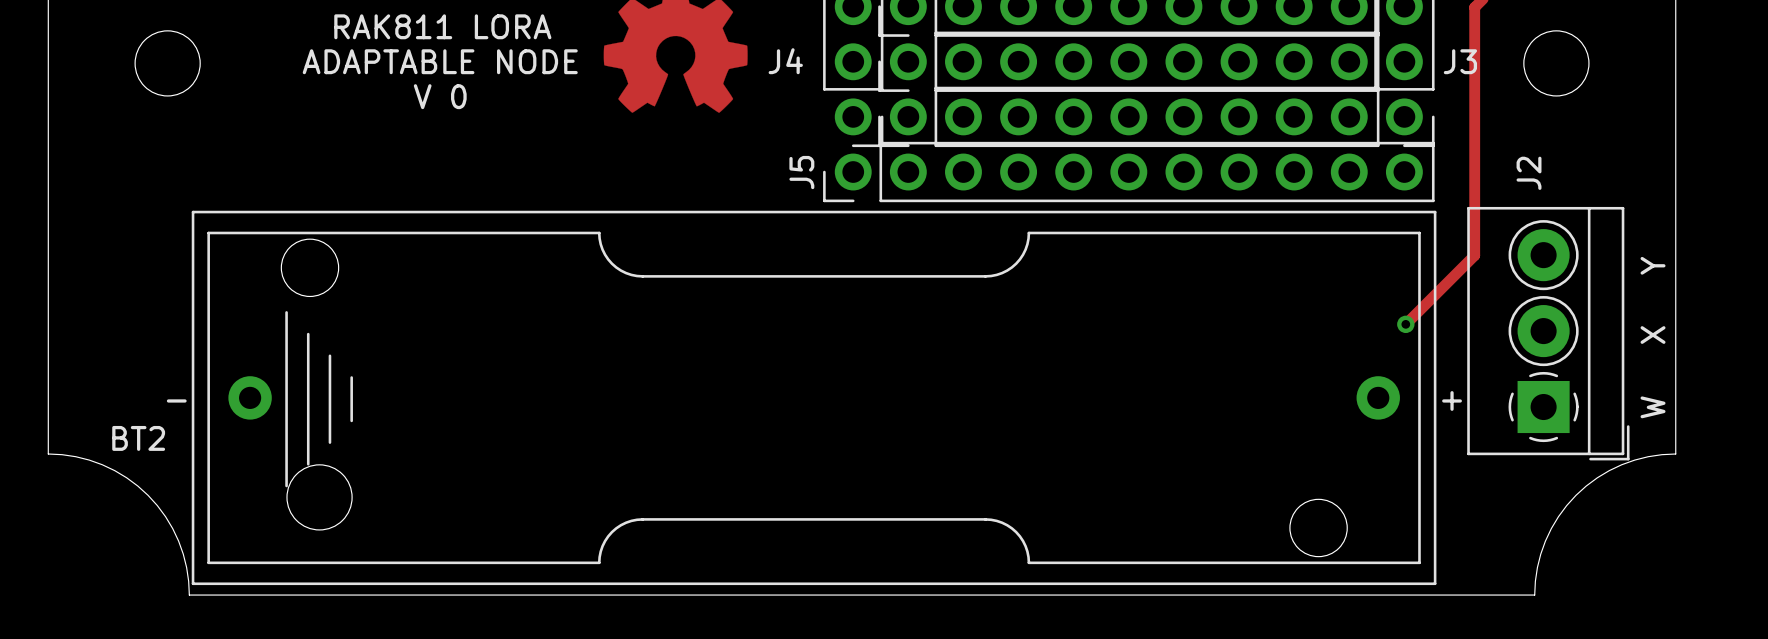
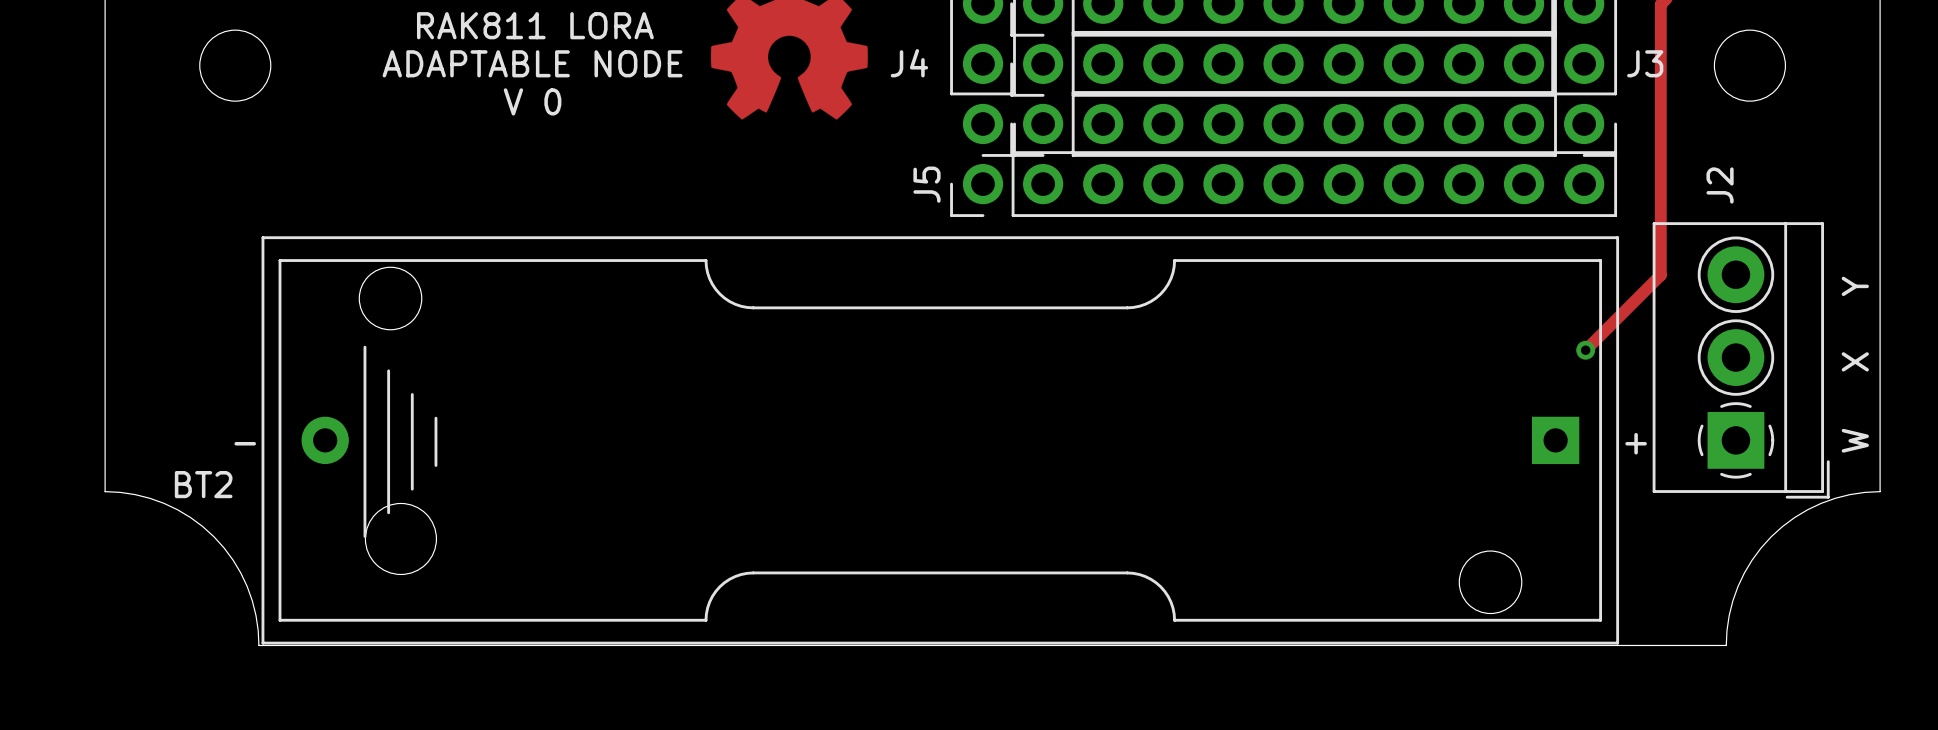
BT2 footprint: [191, 210, 1437, 586] -> [261, 236, 1620, 645]

